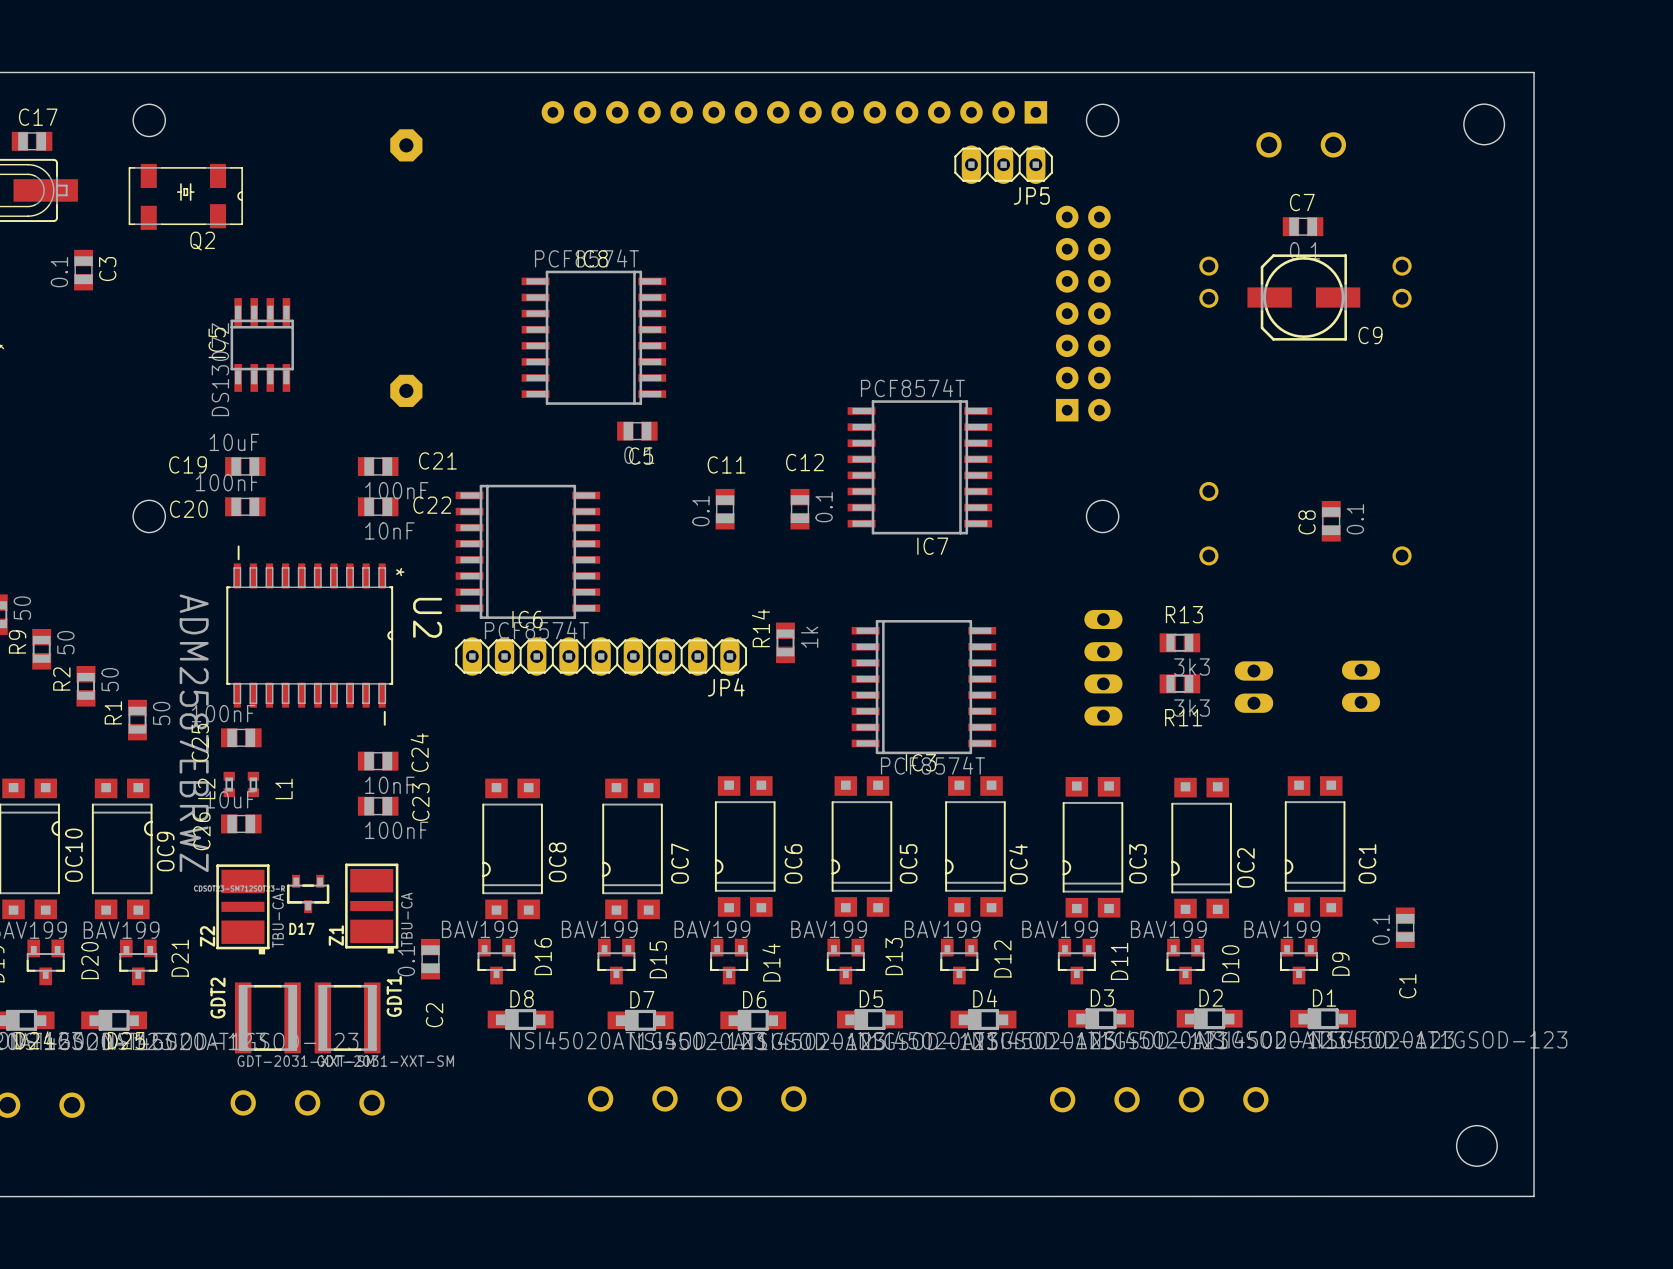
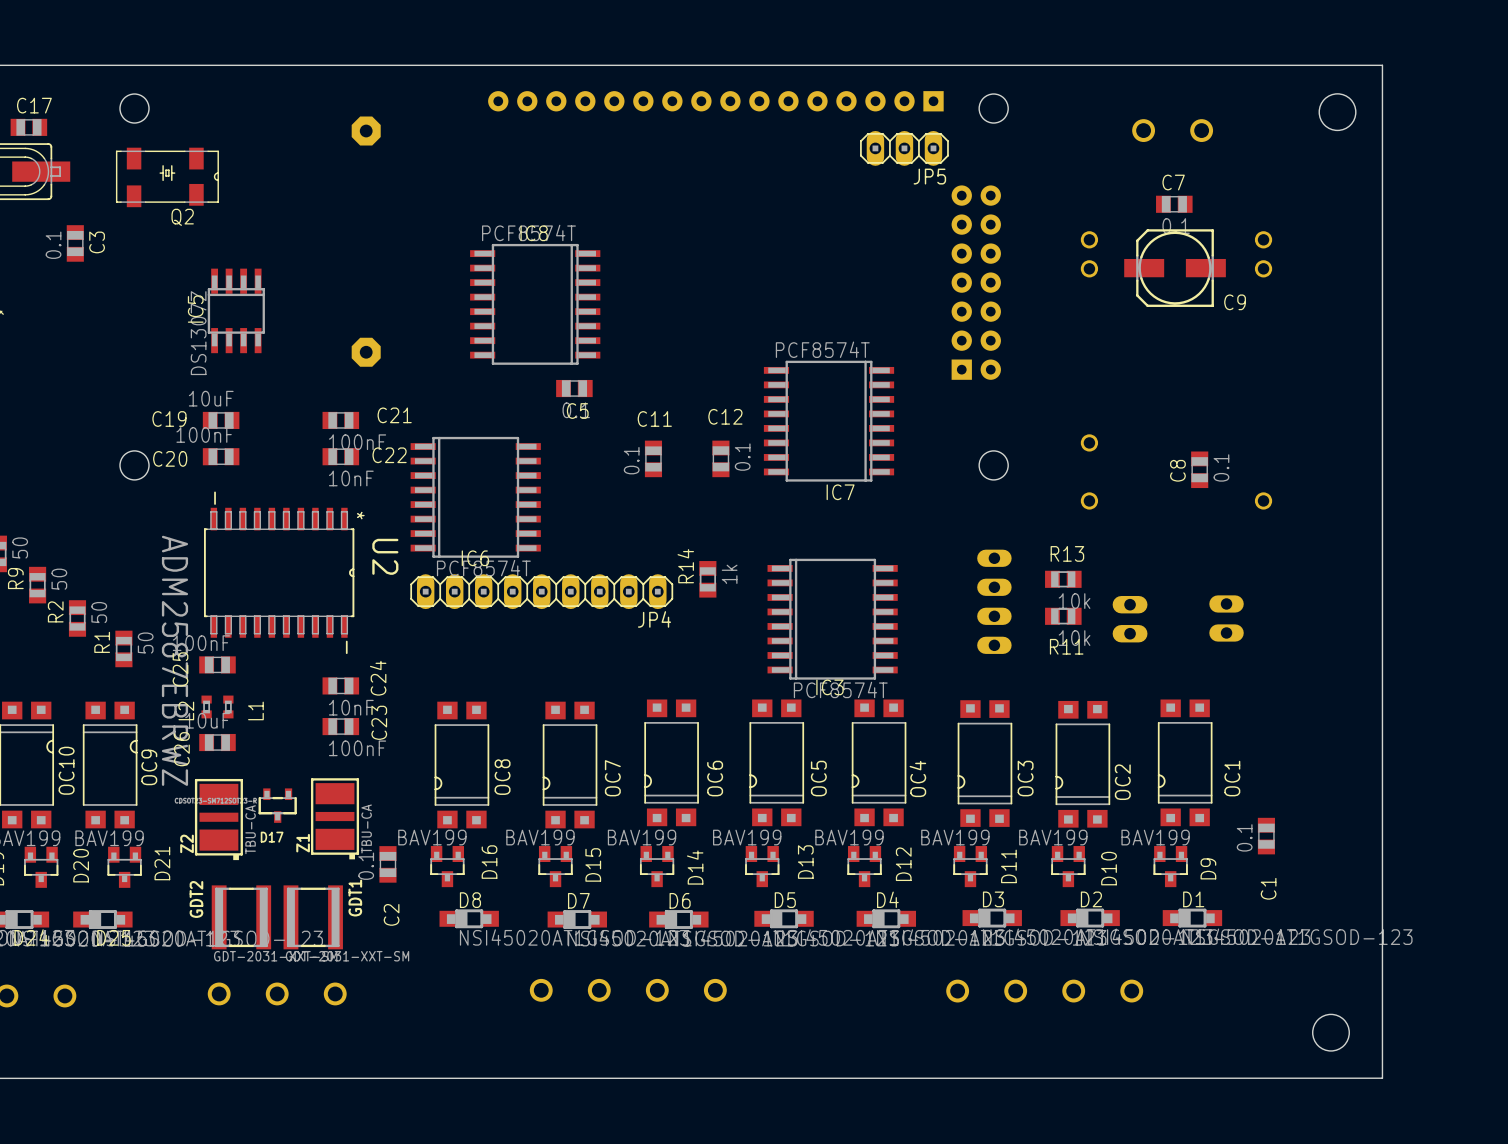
R13 value: 3k3 (1192, 666) -> 10k (1074, 601)
R11 value: 3k3 (1192, 708) -> 10k (1074, 638)

